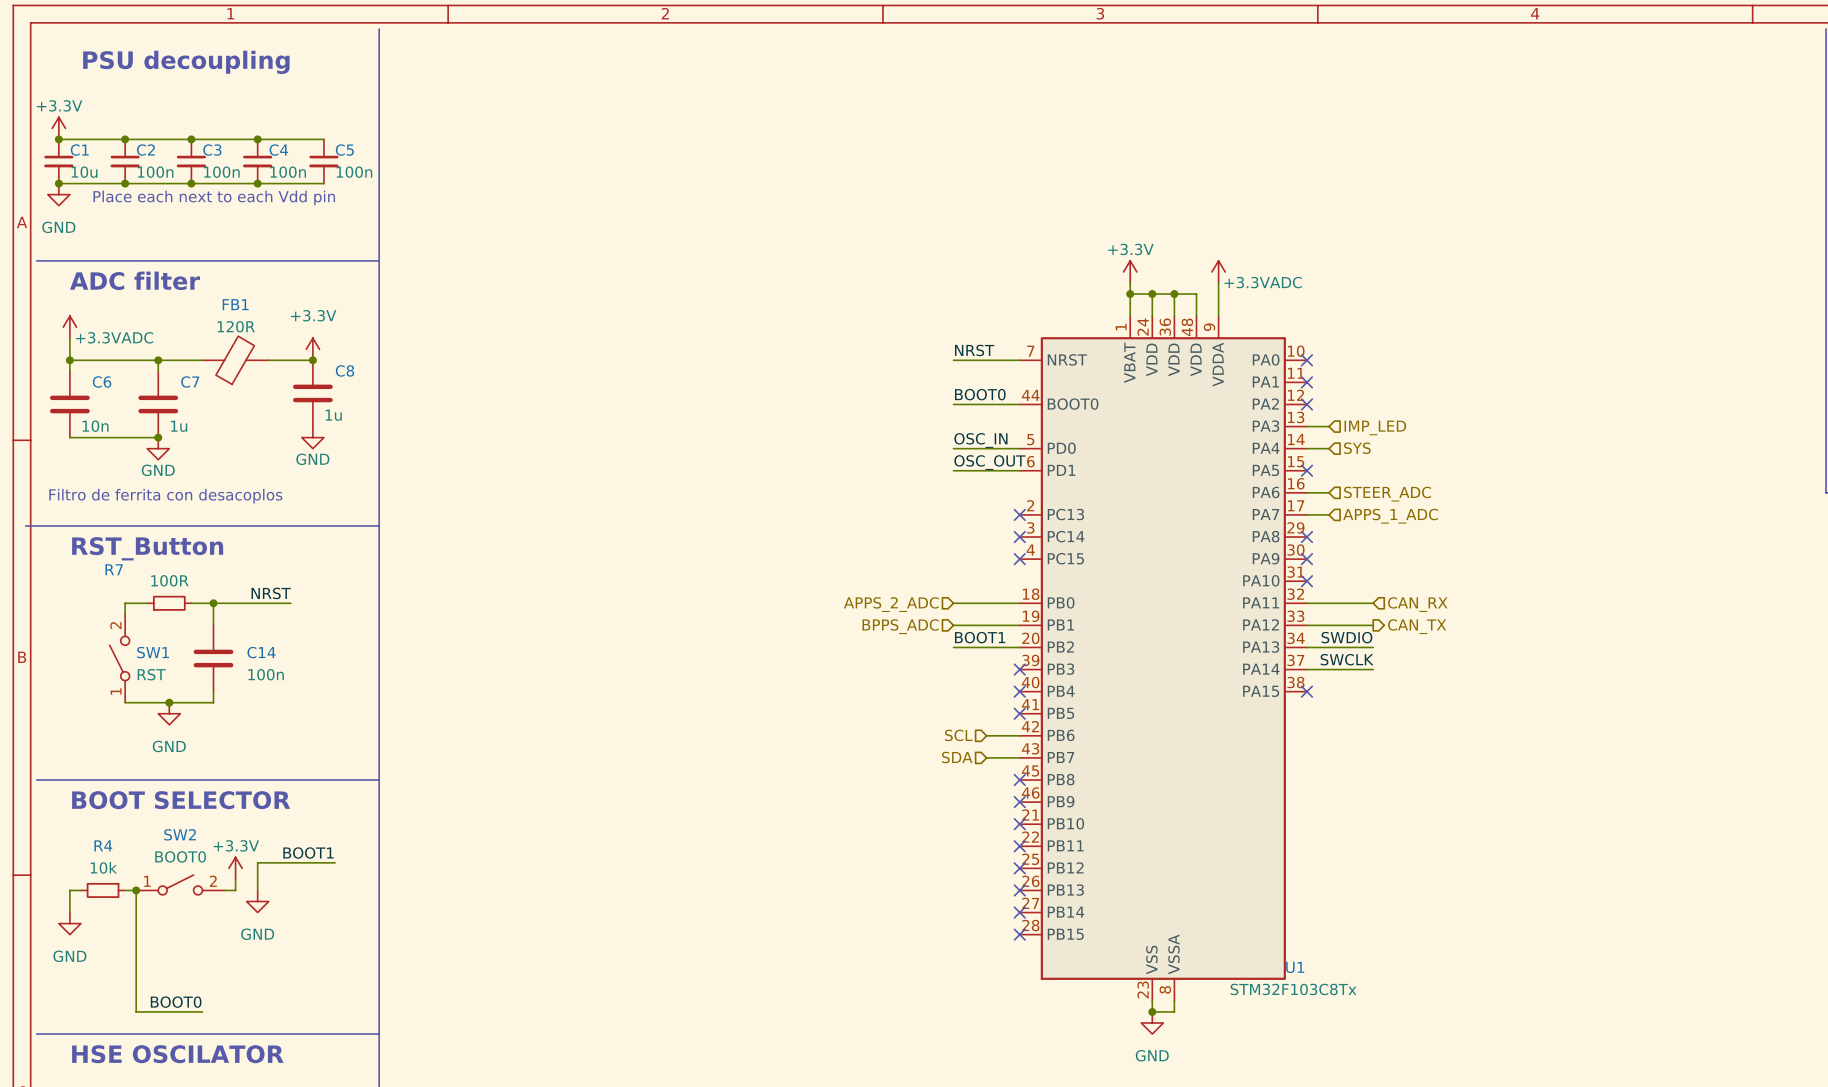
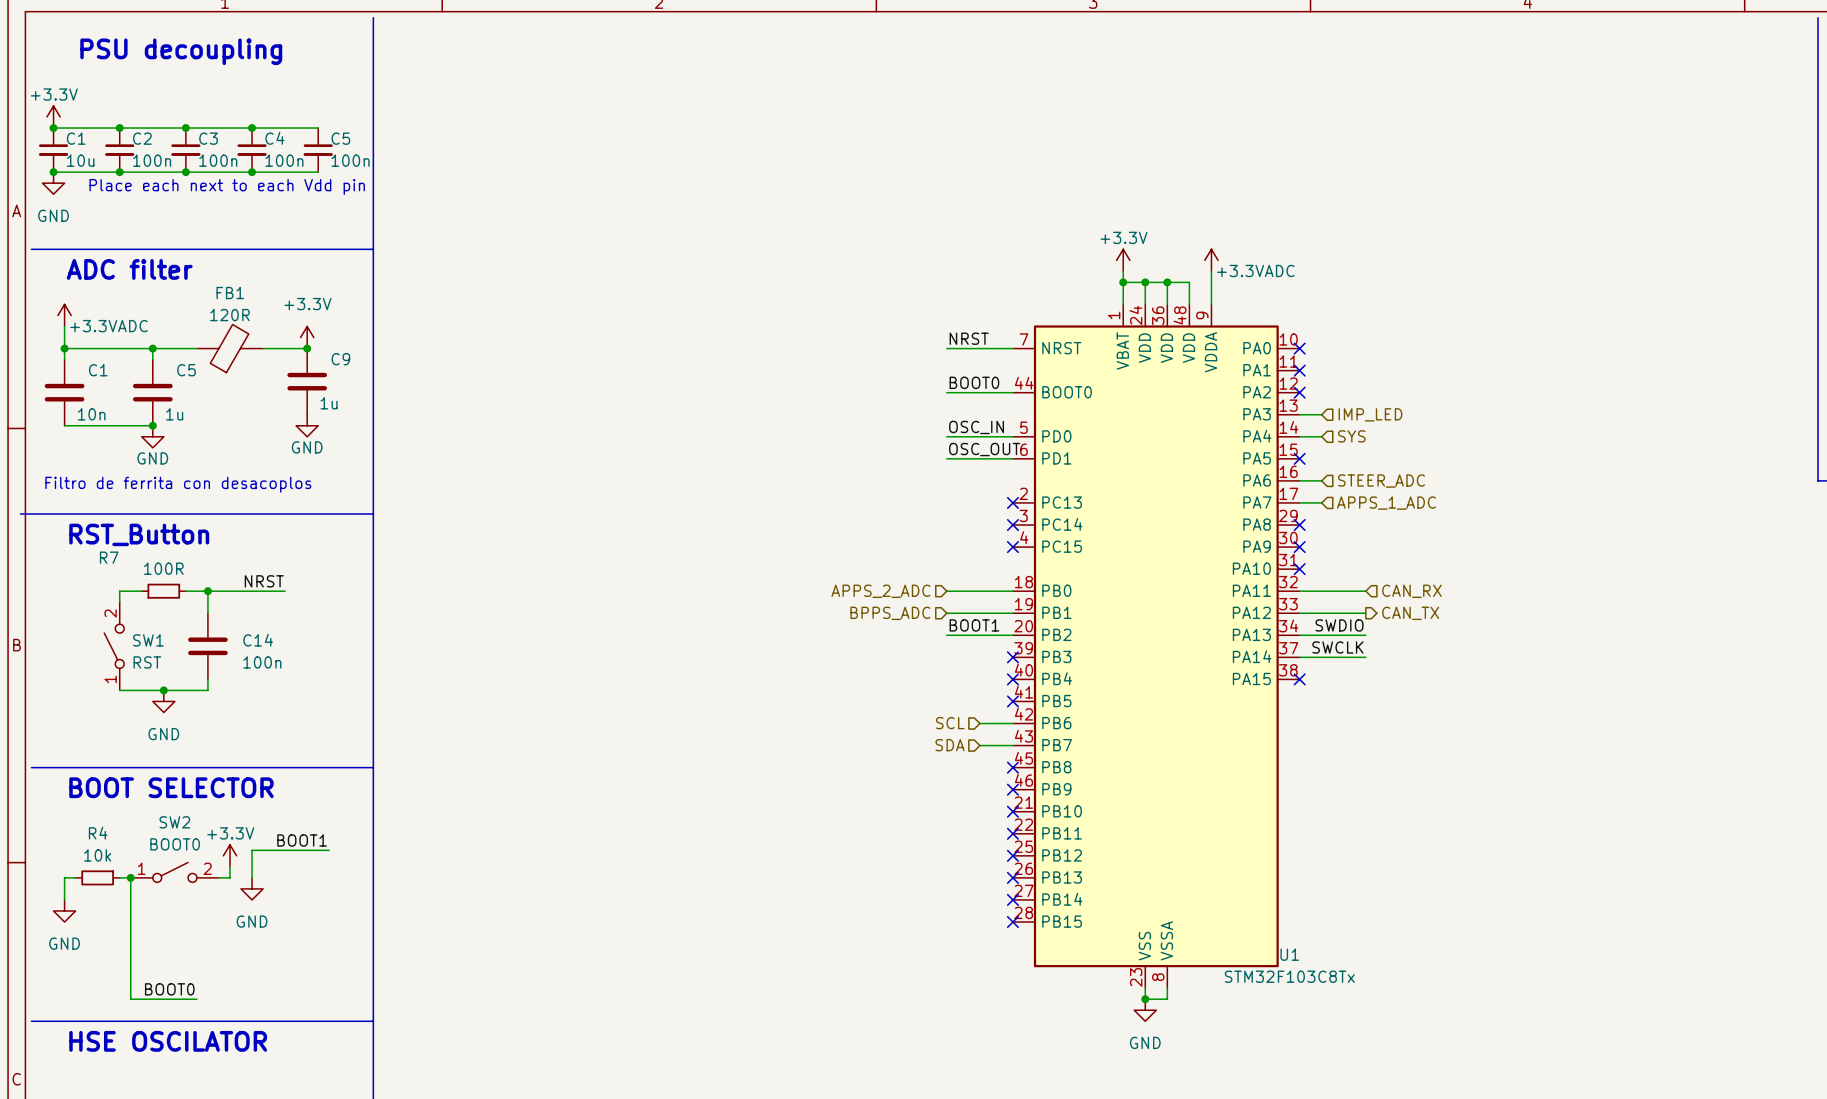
C8 name: C8 (345, 370) -> C9 (340, 359)
C6 name: C6 (102, 381) -> C1 (98, 370)
C7 name: C7 (190, 381) -> C5 (186, 370)

